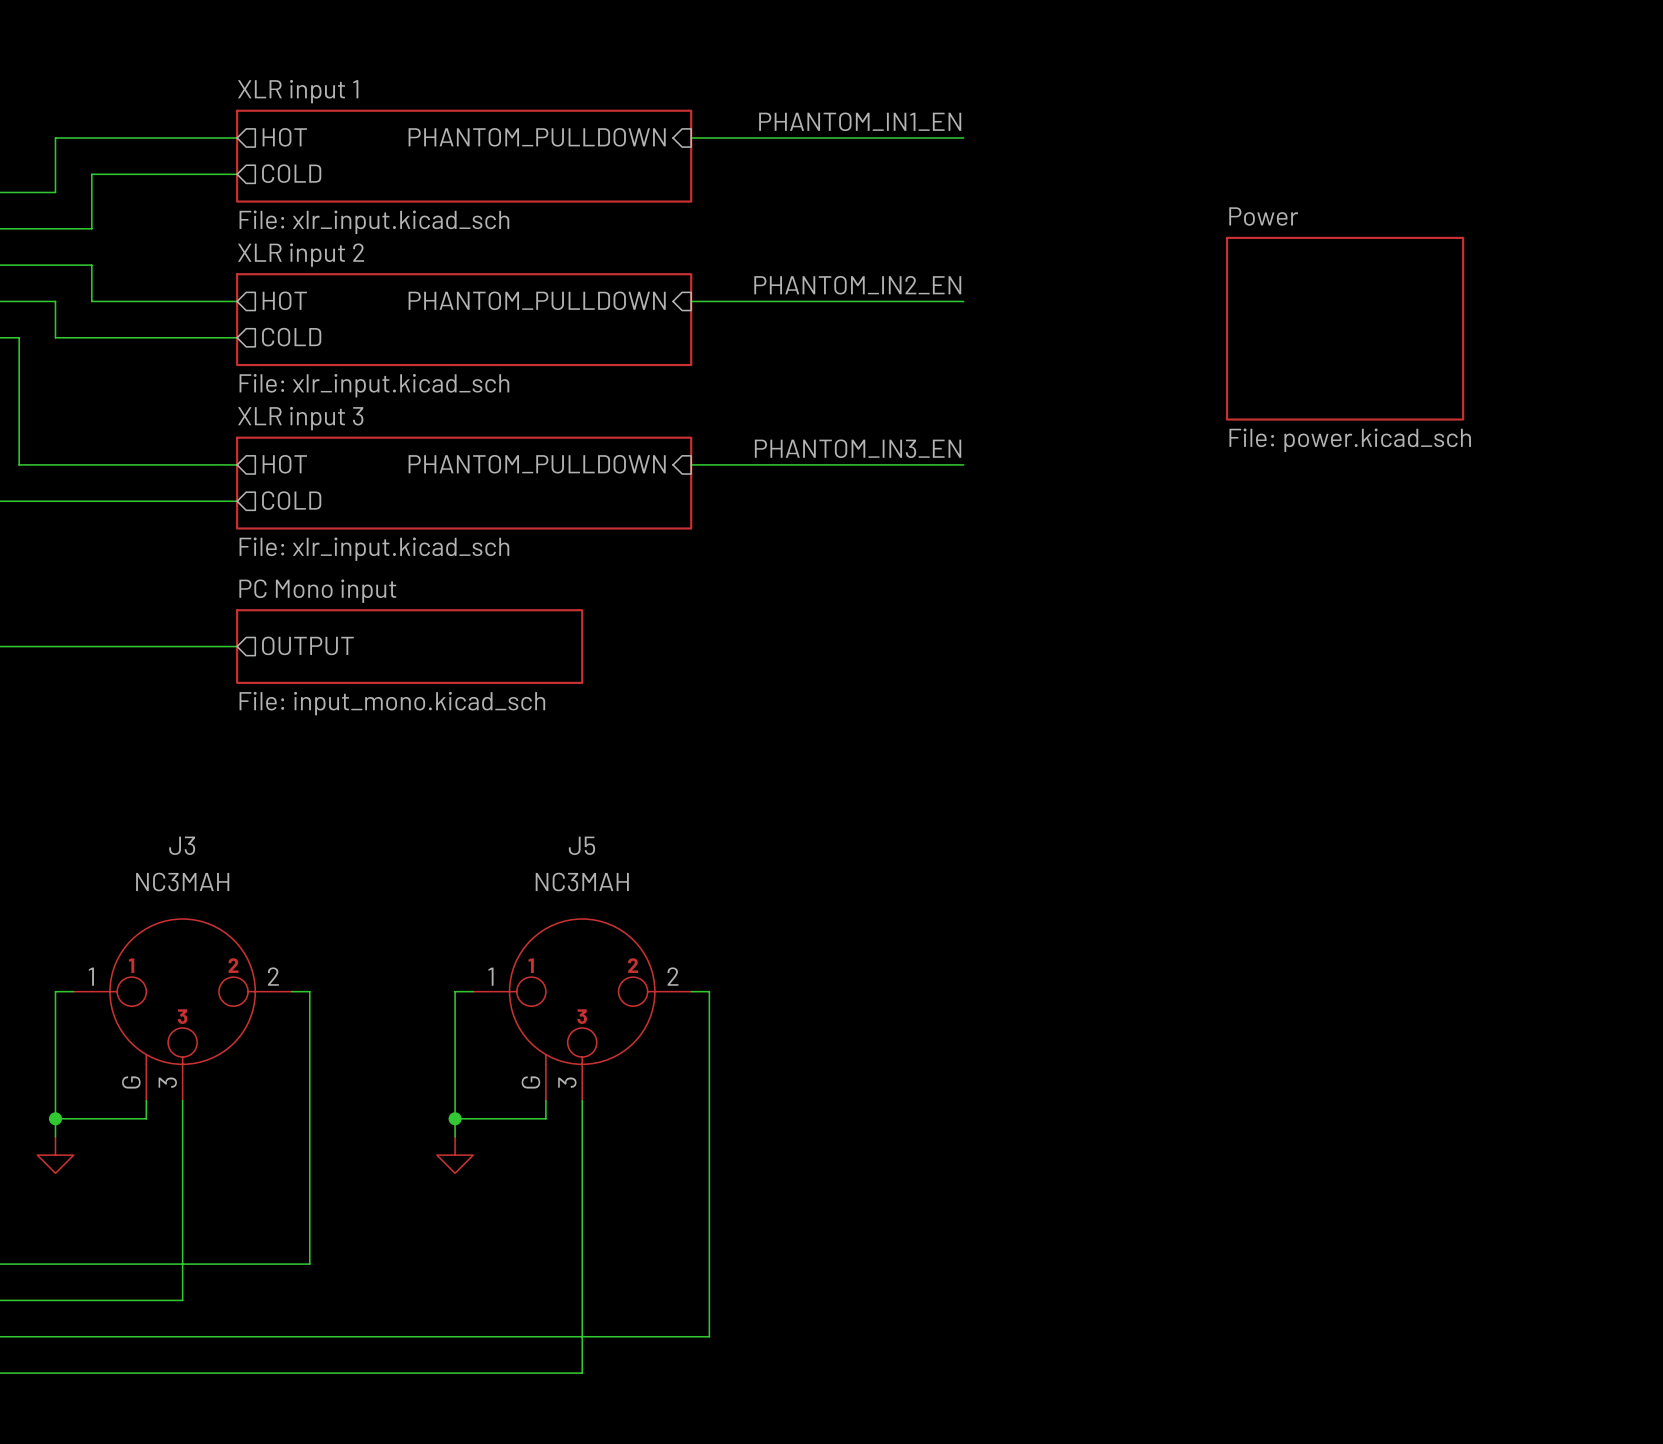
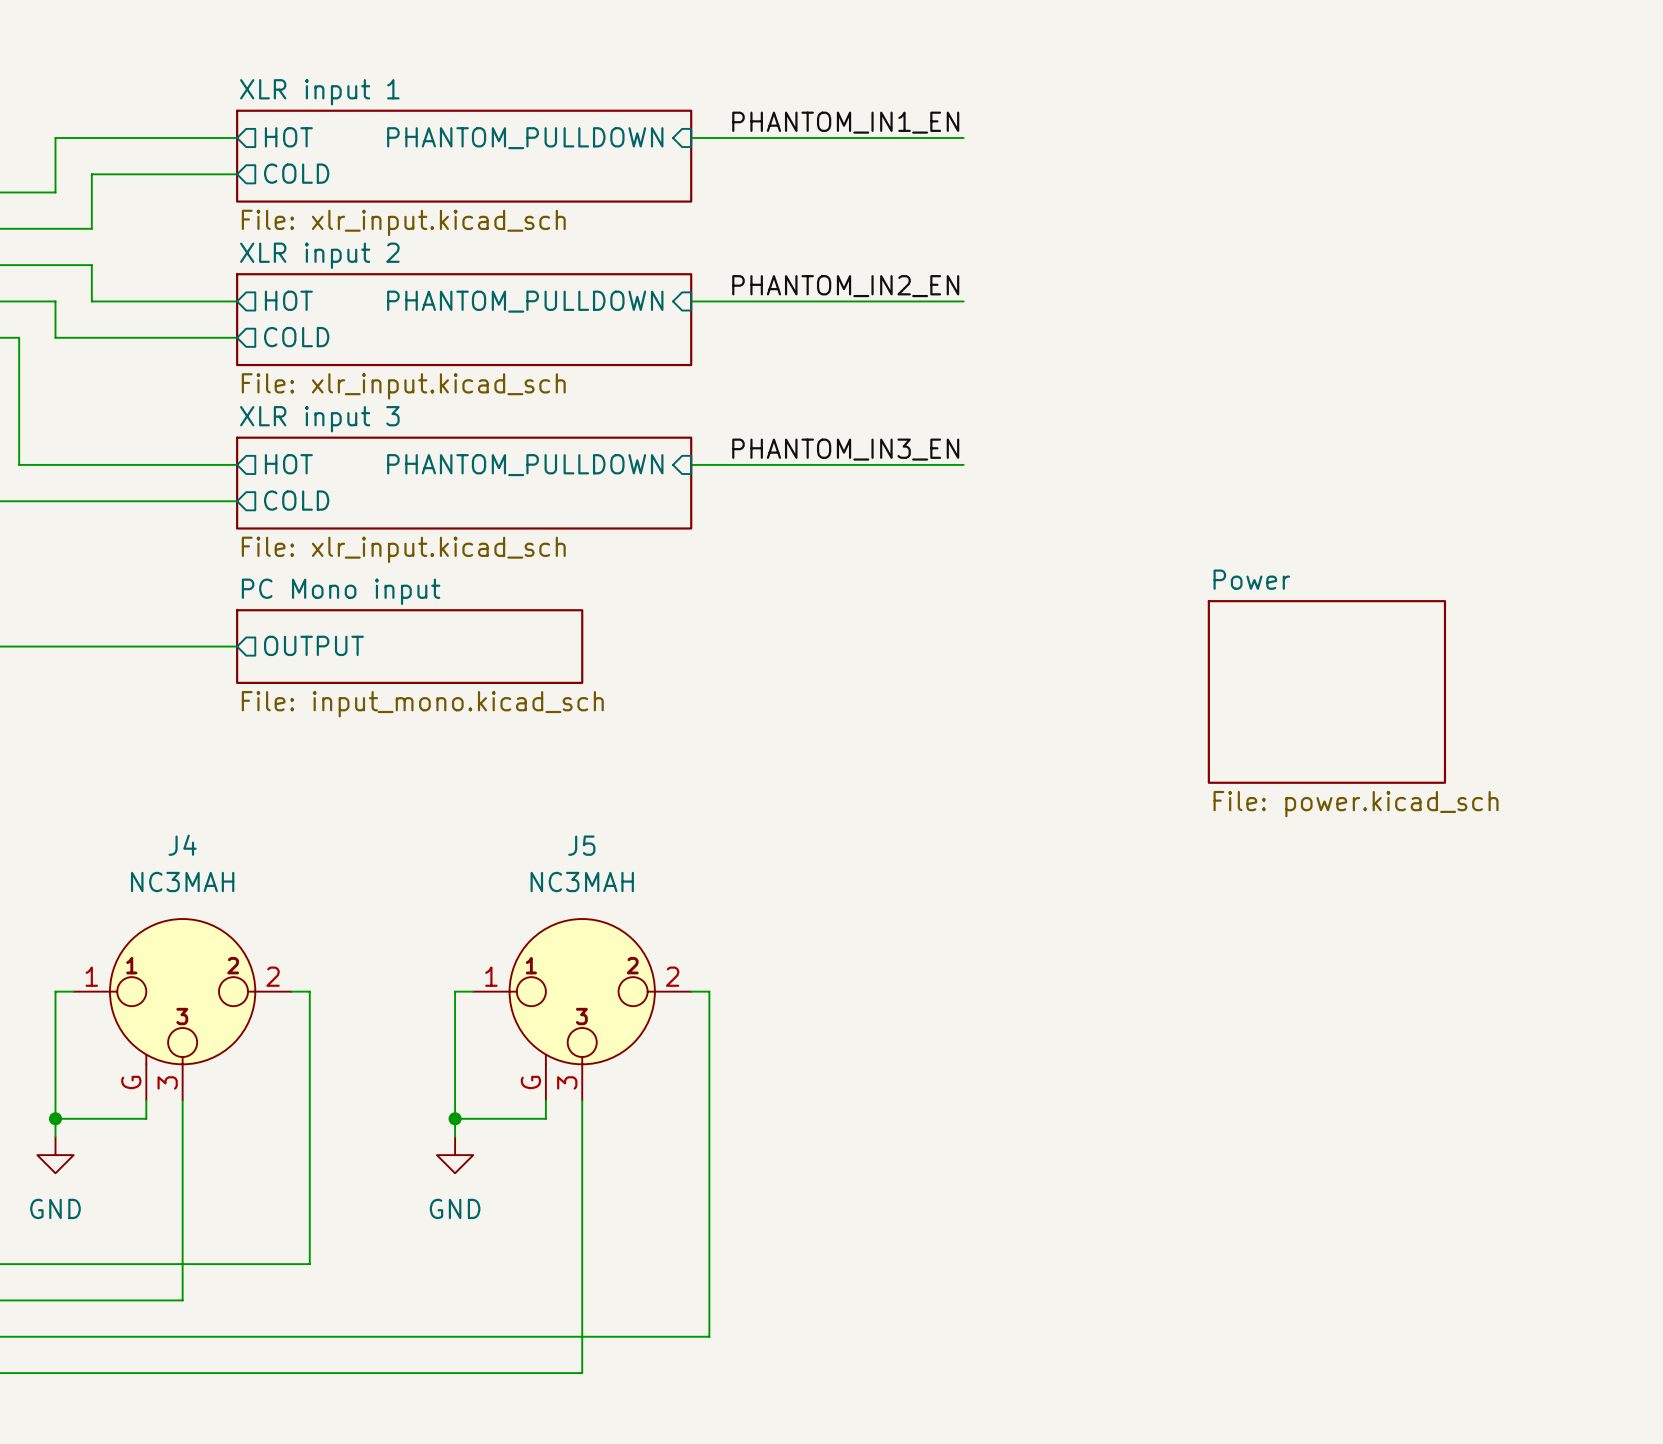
label position: PHANTOM_IN1_EN (860, 121) -> PHANTOM_IN1_EN (845, 122)
label position: PHANTOM_IN2_EN (857, 285) -> PHANTOM_IN2_EN (845, 286)
sheet Power: File: power.kicad_sch (1345, 328) -> none
label position: PHANTOM_IN3_EN (858, 448) -> PHANTOM_IN3_EN (845, 449)
sheet Power: none -> File: power.kicad_sch (1326, 691)
J3 name: J3 (182, 845) -> J4 (182, 845)
power symbol text: none -> GND (55, 1208)
power symbol text: none -> GND (455, 1208)

